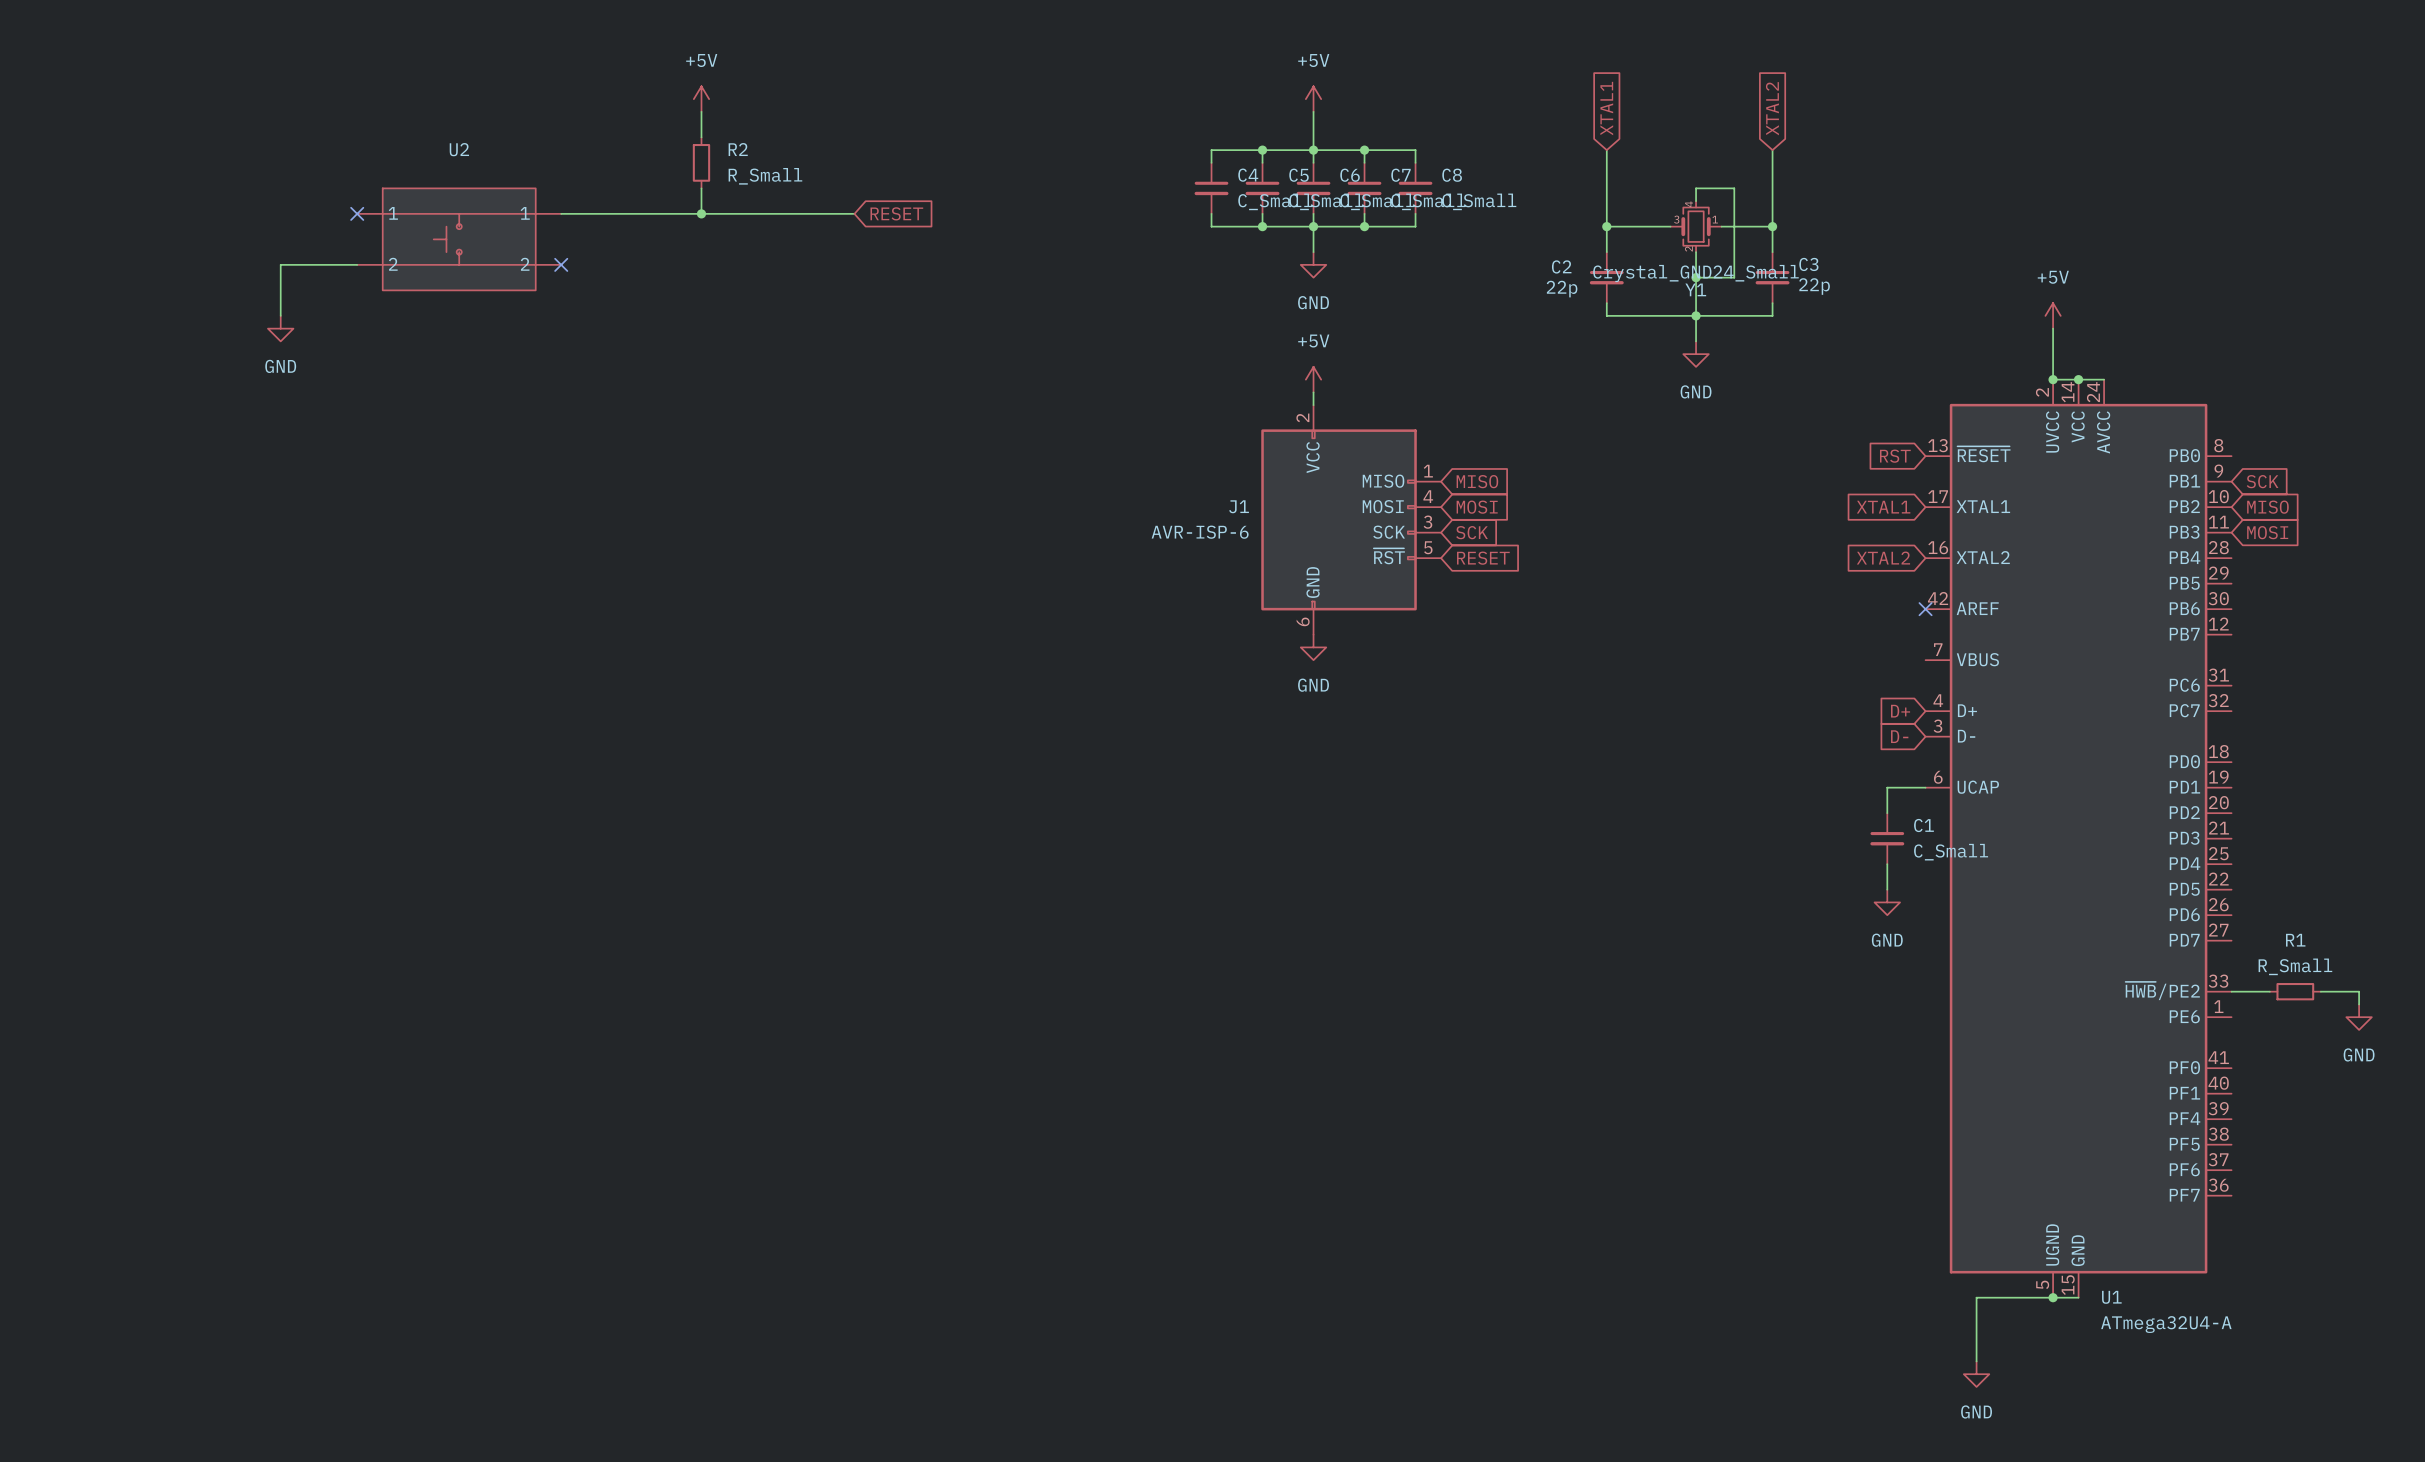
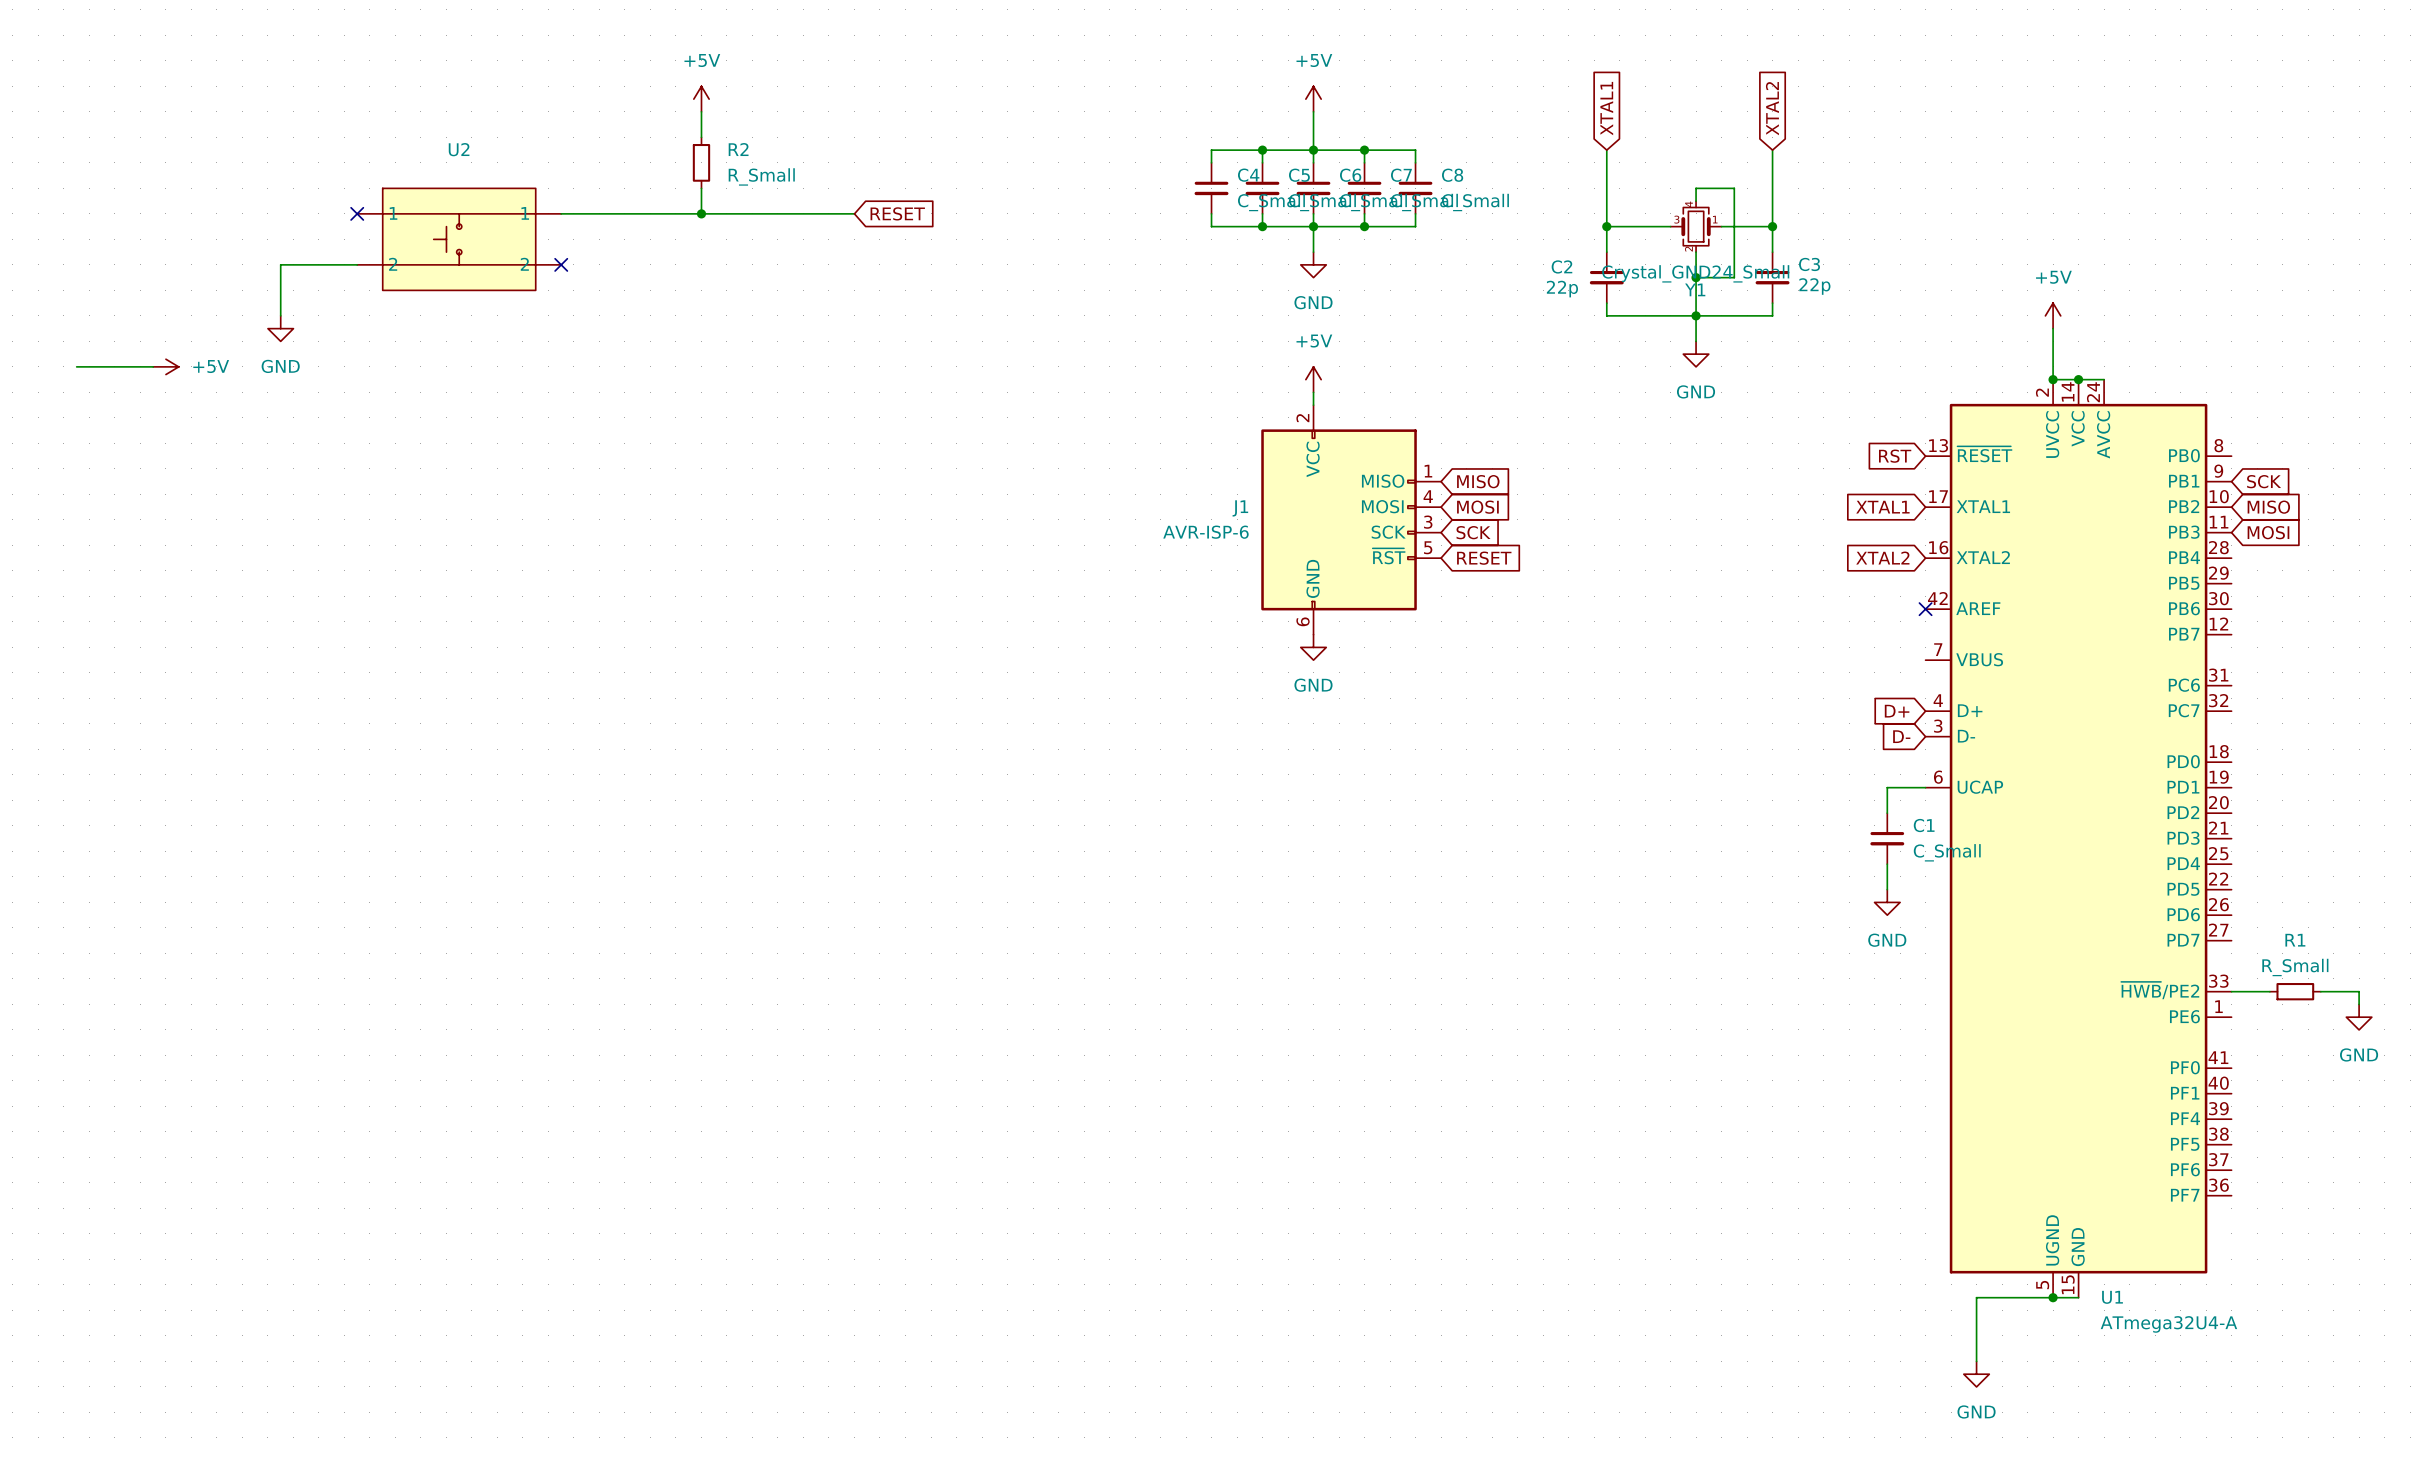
wire: none -> (76, 366) (153, 366)
power symbol: none -> +5V (165, 366)

